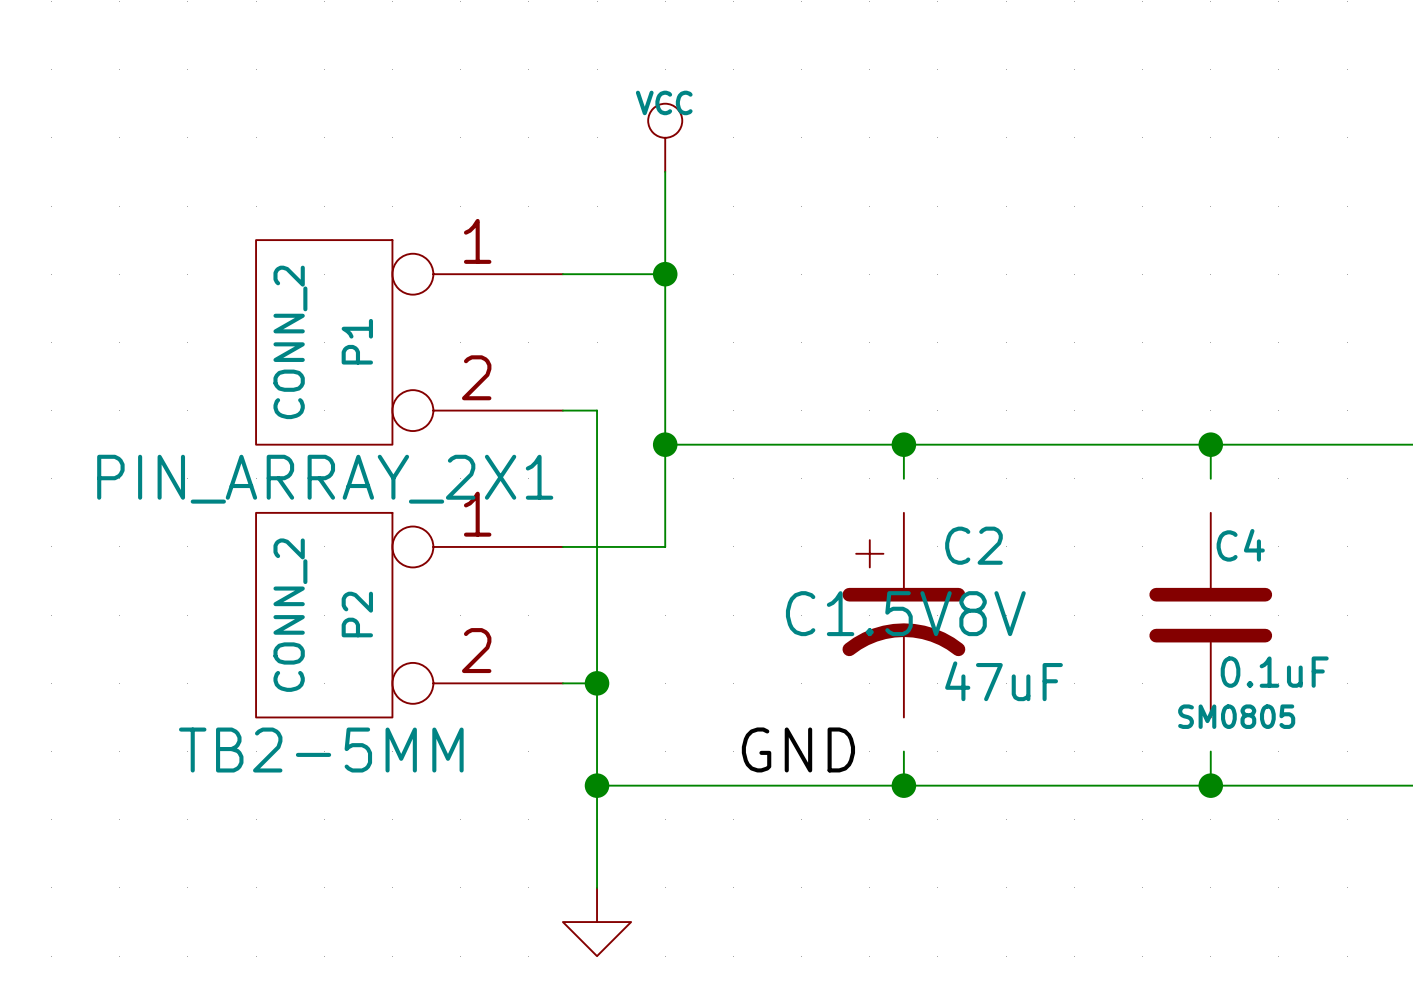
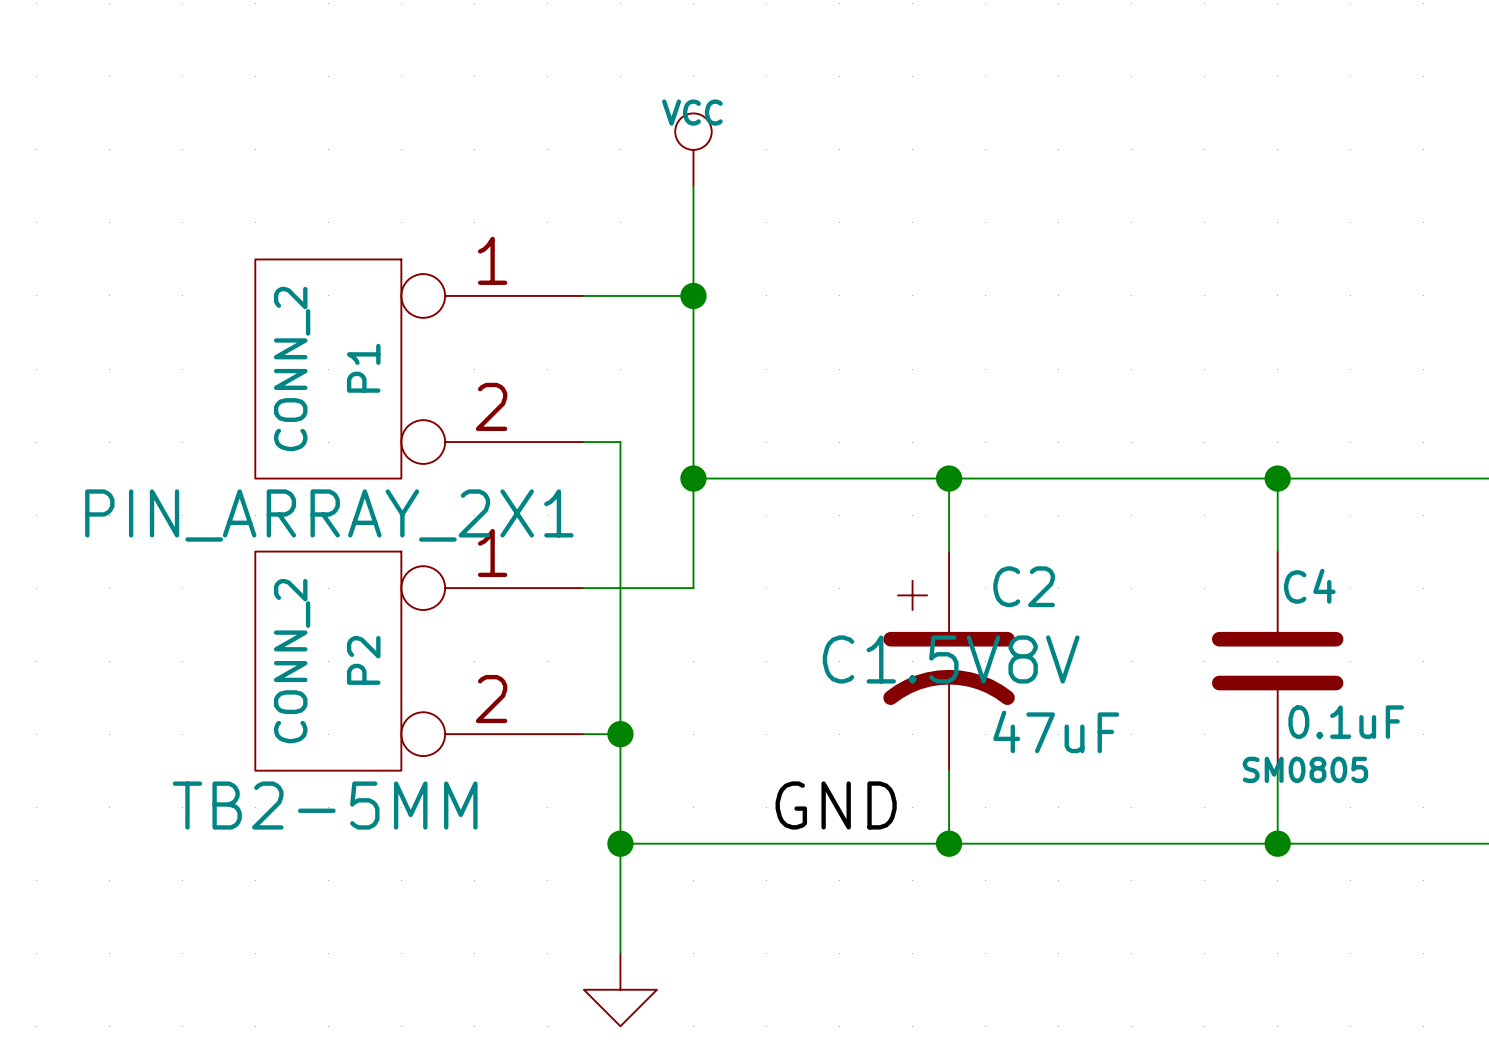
wire: none -> (949, 515) (949, 551)
wire: none -> (1277, 515) (1277, 551)
wire: none -> (949, 770) (949, 807)
wire: none -> (1277, 770) (1277, 807)

